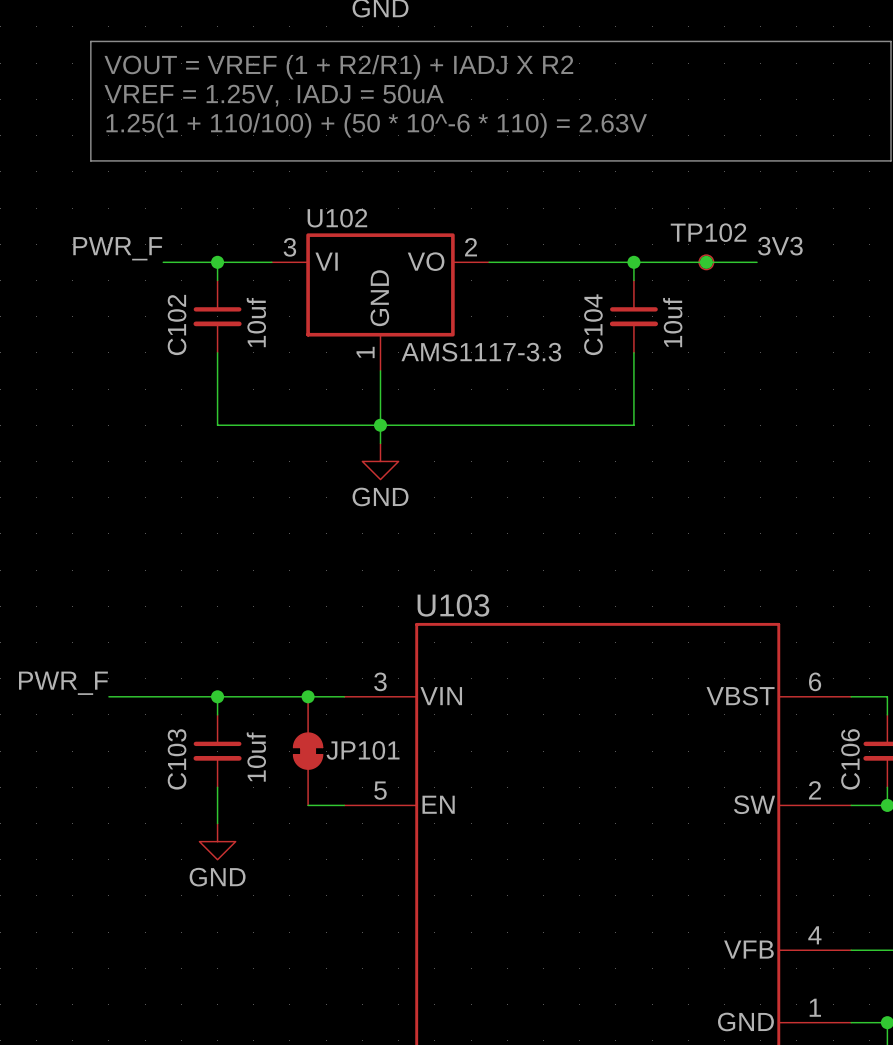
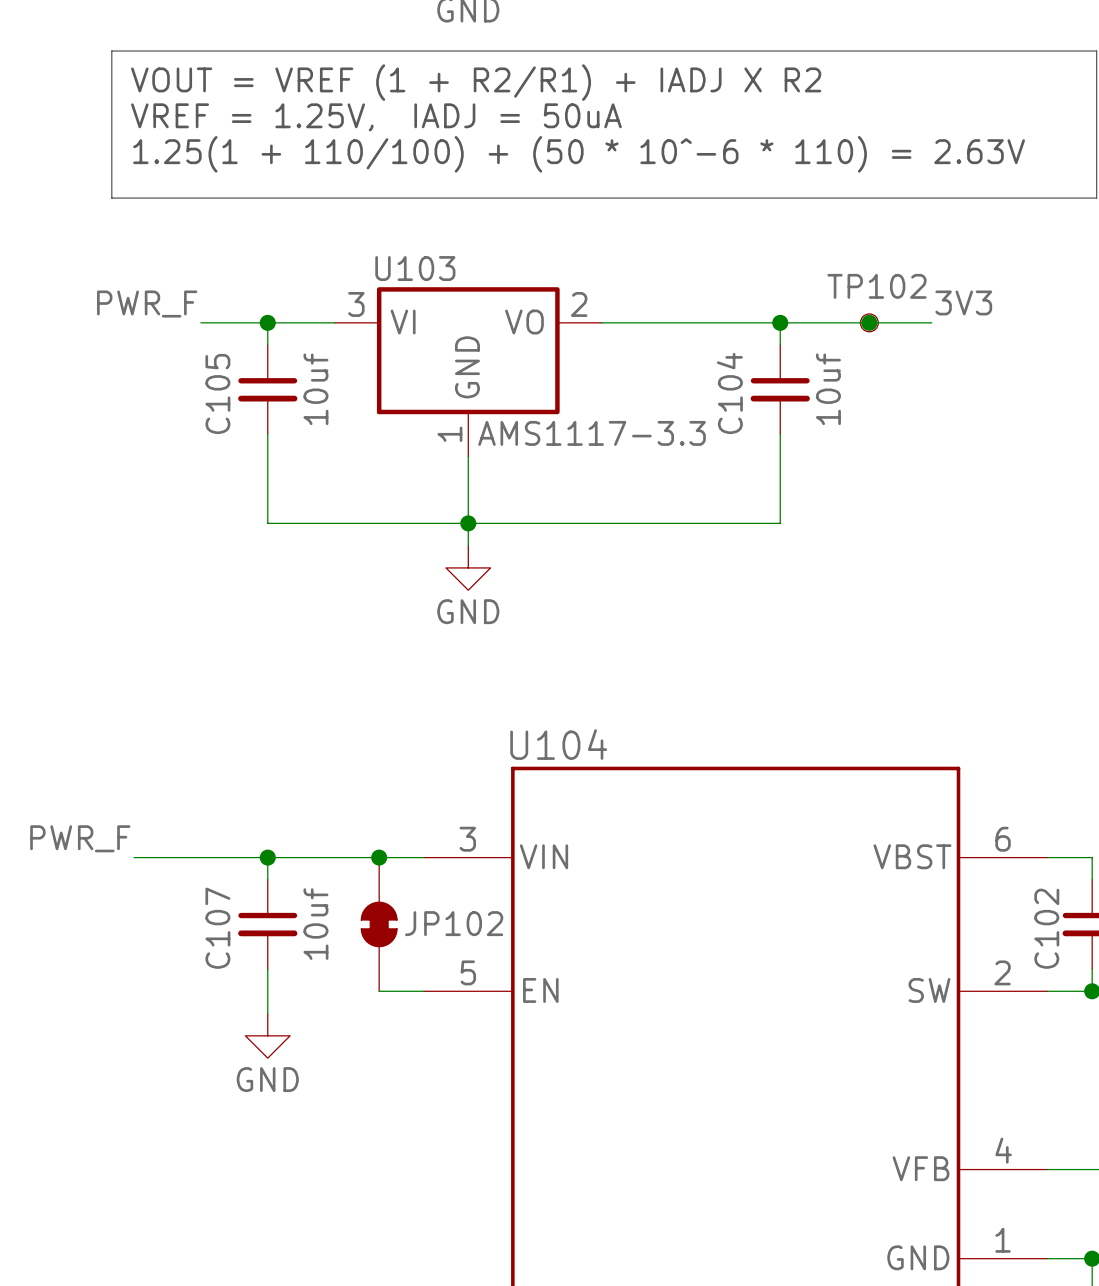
U102 name: U102 (337, 218) -> U103 (415, 268)
C102 name: C102 (177, 324) -> C105 (217, 393)
U103 name: U103 (453, 605) -> U104 (558, 744)
JP101 name: JP101 (363, 750) -> JP102 (454, 923)
C103 name: C103 (177, 759) -> C107 (217, 928)
C106 name: C106 (850, 759) -> C102 (1046, 928)

